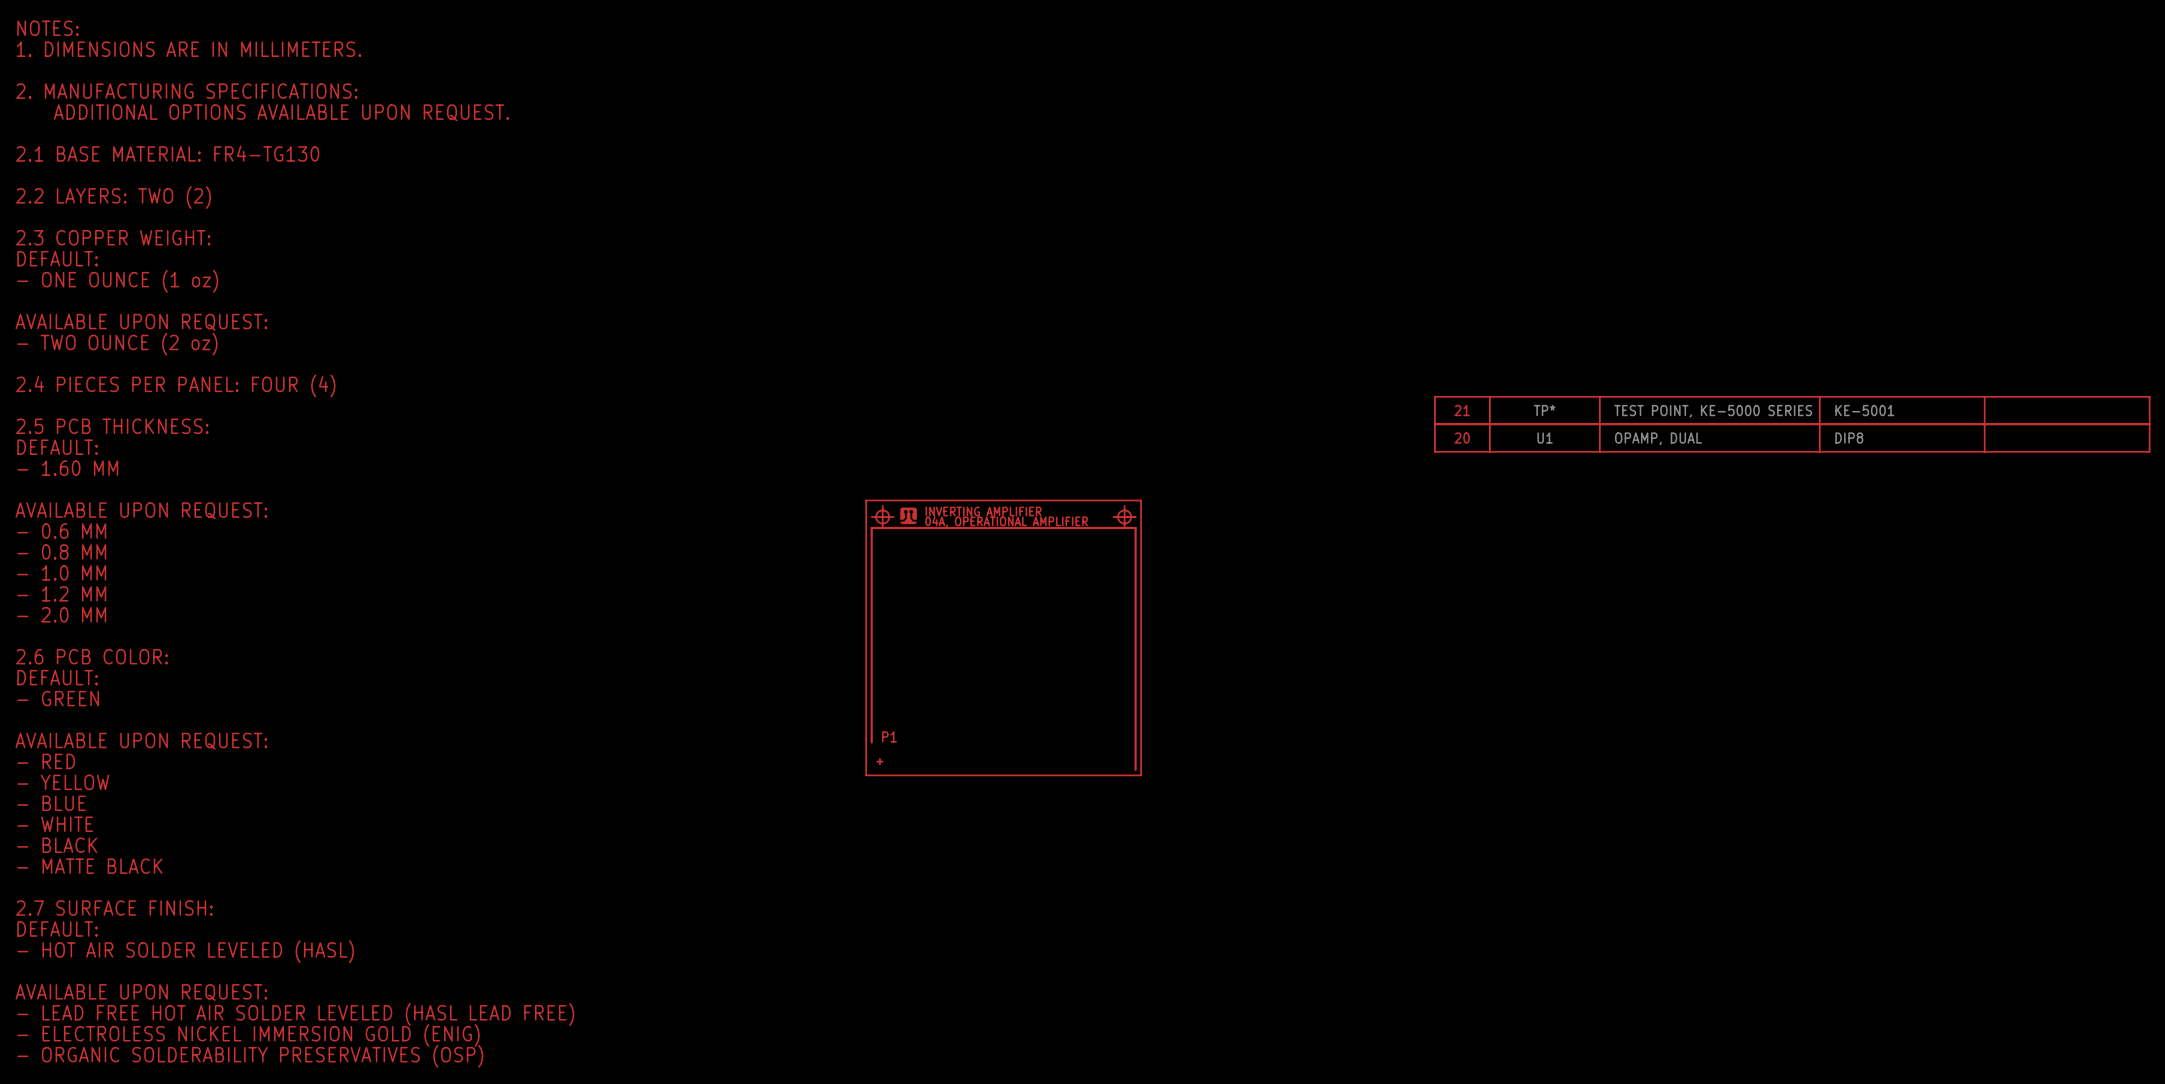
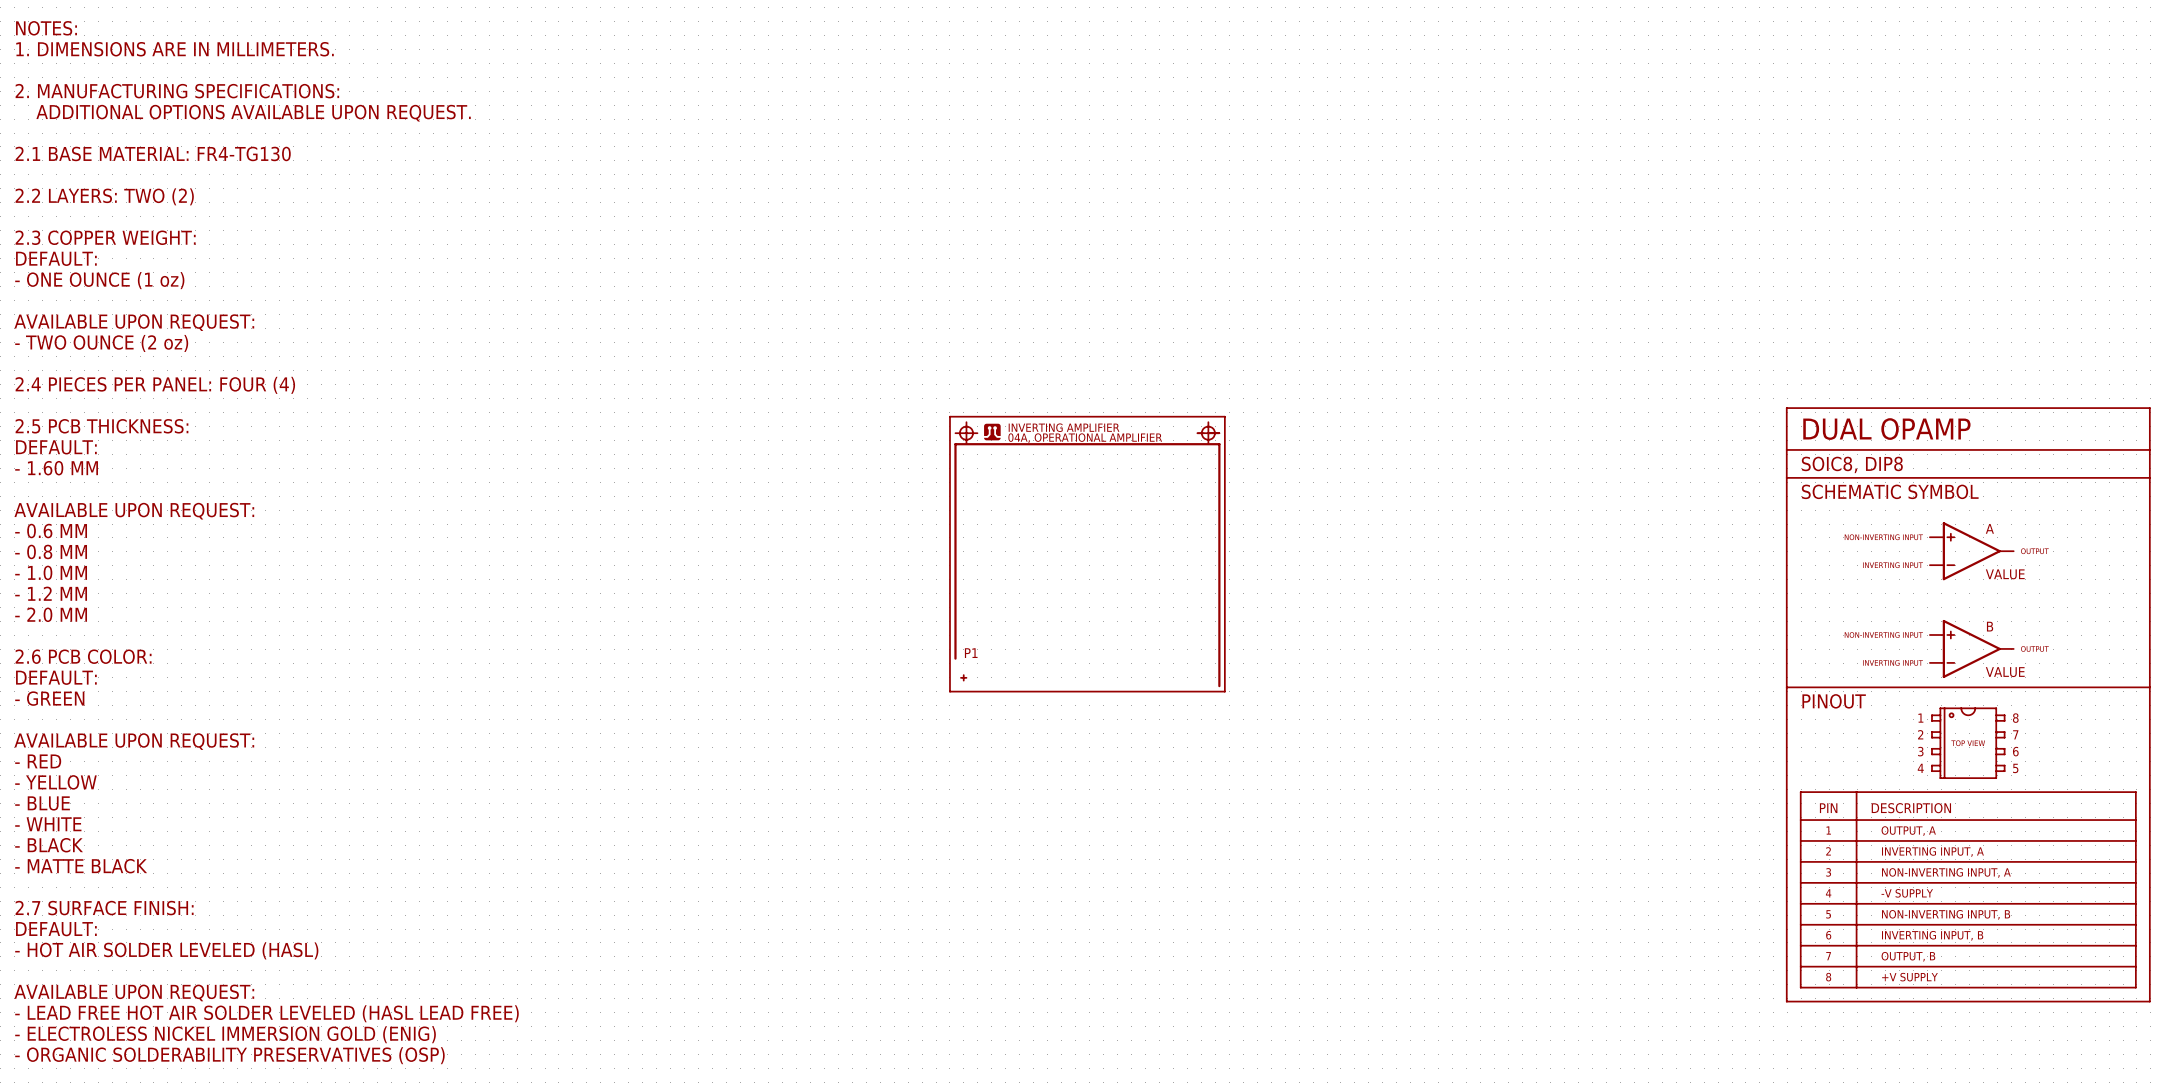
part: (1792, 410) -> none
part: (1792, 438) -> none
part position: (1003, 637) -> (1087, 554)
part: none -> (1968, 704)

